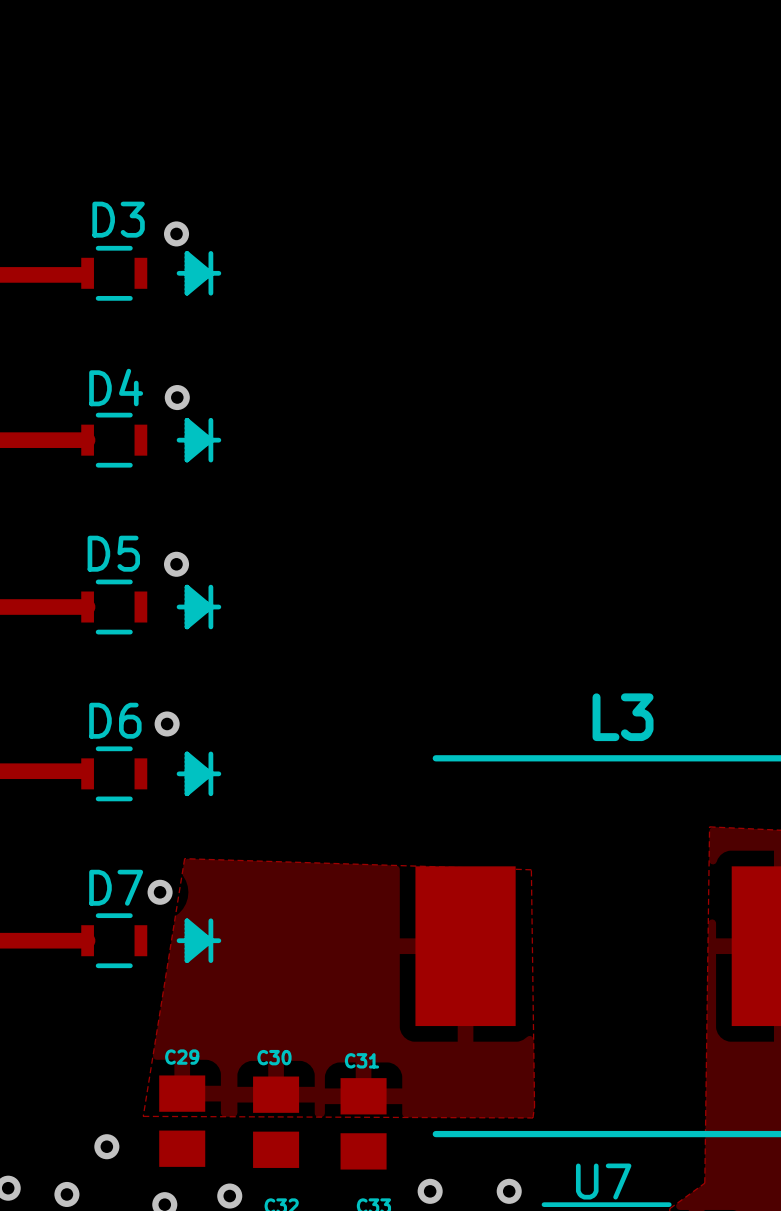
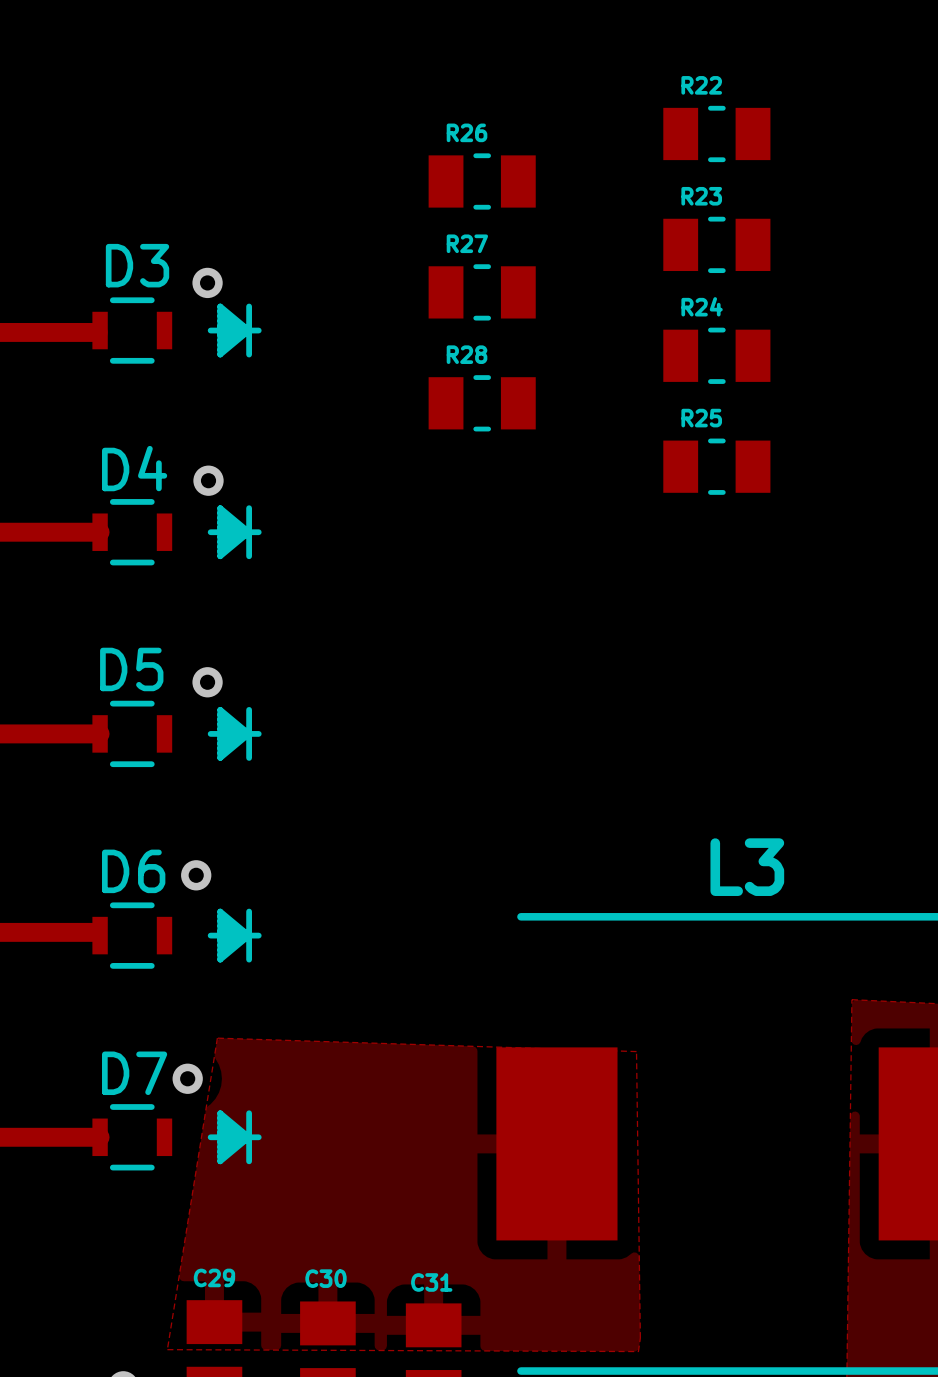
R22: none -> (716, 133)
R26: none -> (482, 181)
R23: none -> (716, 244)
R27: none -> (482, 292)
R24: none -> (716, 355)
R28: none -> (482, 403)
R25: none -> (716, 466)

